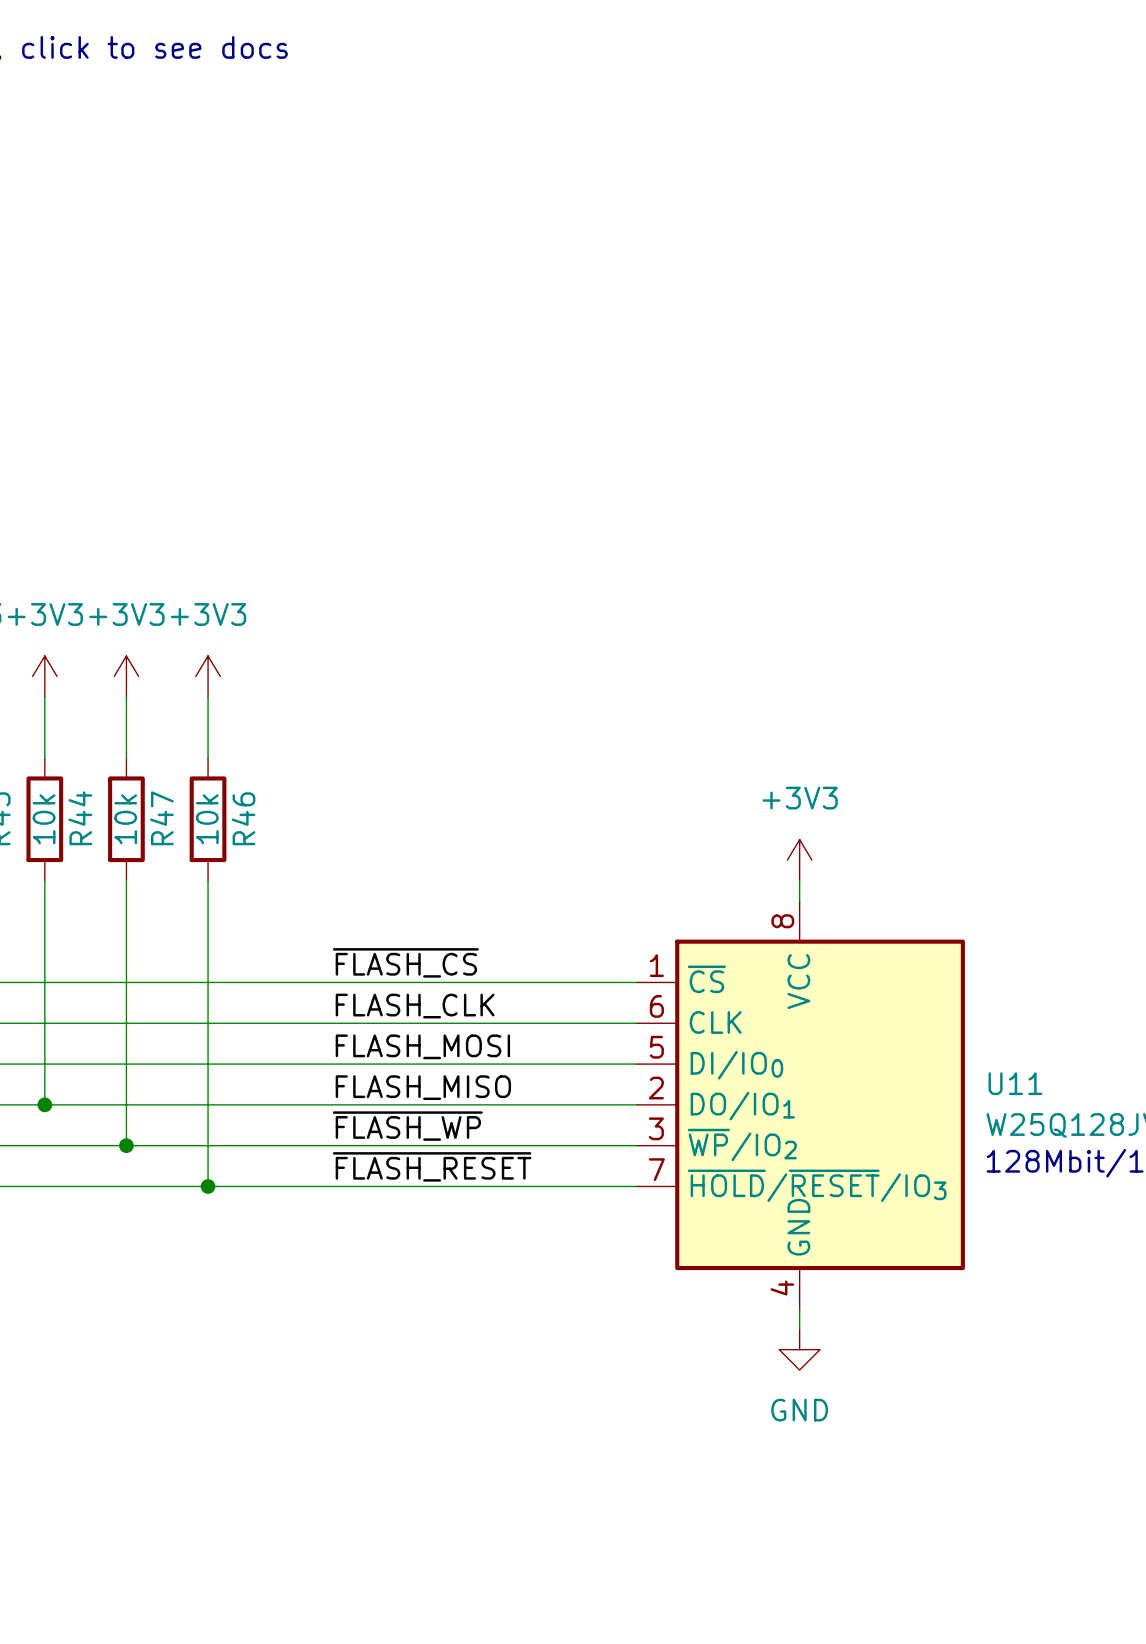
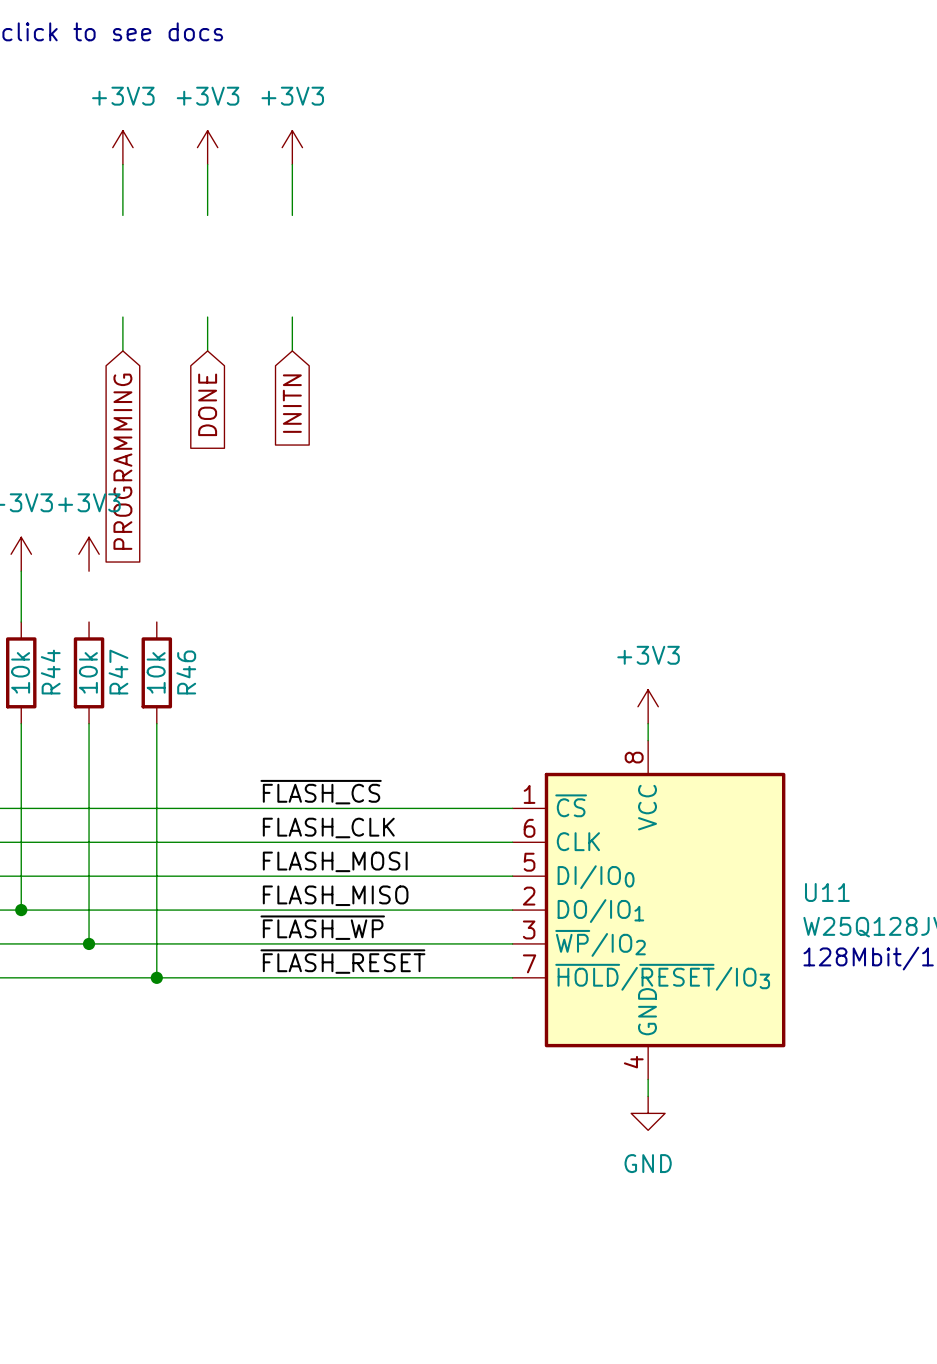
power symbol: none -> +3V3 (122, 147)
power symbol: none -> +3V3 (207, 147)
power symbol: none -> +3V3 (292, 147)
wire: none -> (122, 164) (122, 215)
wire: none -> (207, 164) (207, 215)
wire: none -> (292, 164) (292, 215)
wire: none -> (122, 317) (122, 350)
wire: none -> (207, 317) (207, 350)
wire: none -> (292, 317) (292, 350)
global label: none -> INITN (292, 403)
global label: none -> DONE (207, 404)
global label: none -> PROGRAMMING (122, 461)
power symbol: +3V3 (208, 676) -> none
wire: (126, 696) (126, 758) -> none
wire: (208, 696) (208, 758) -> none

